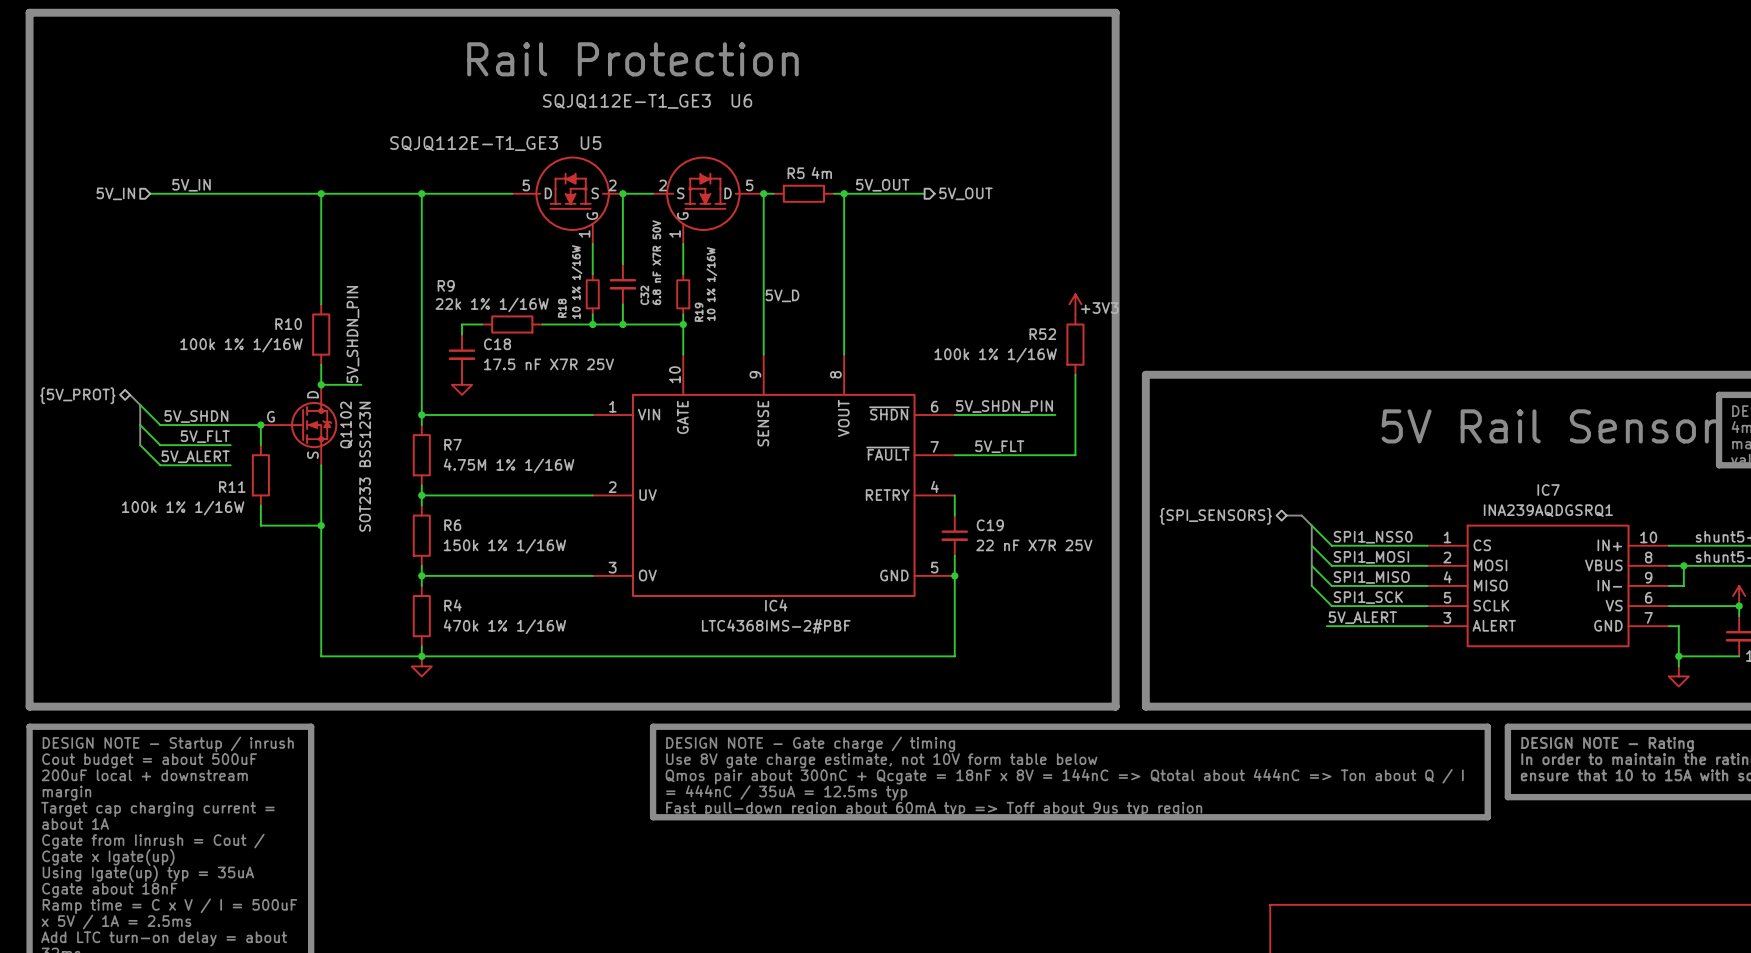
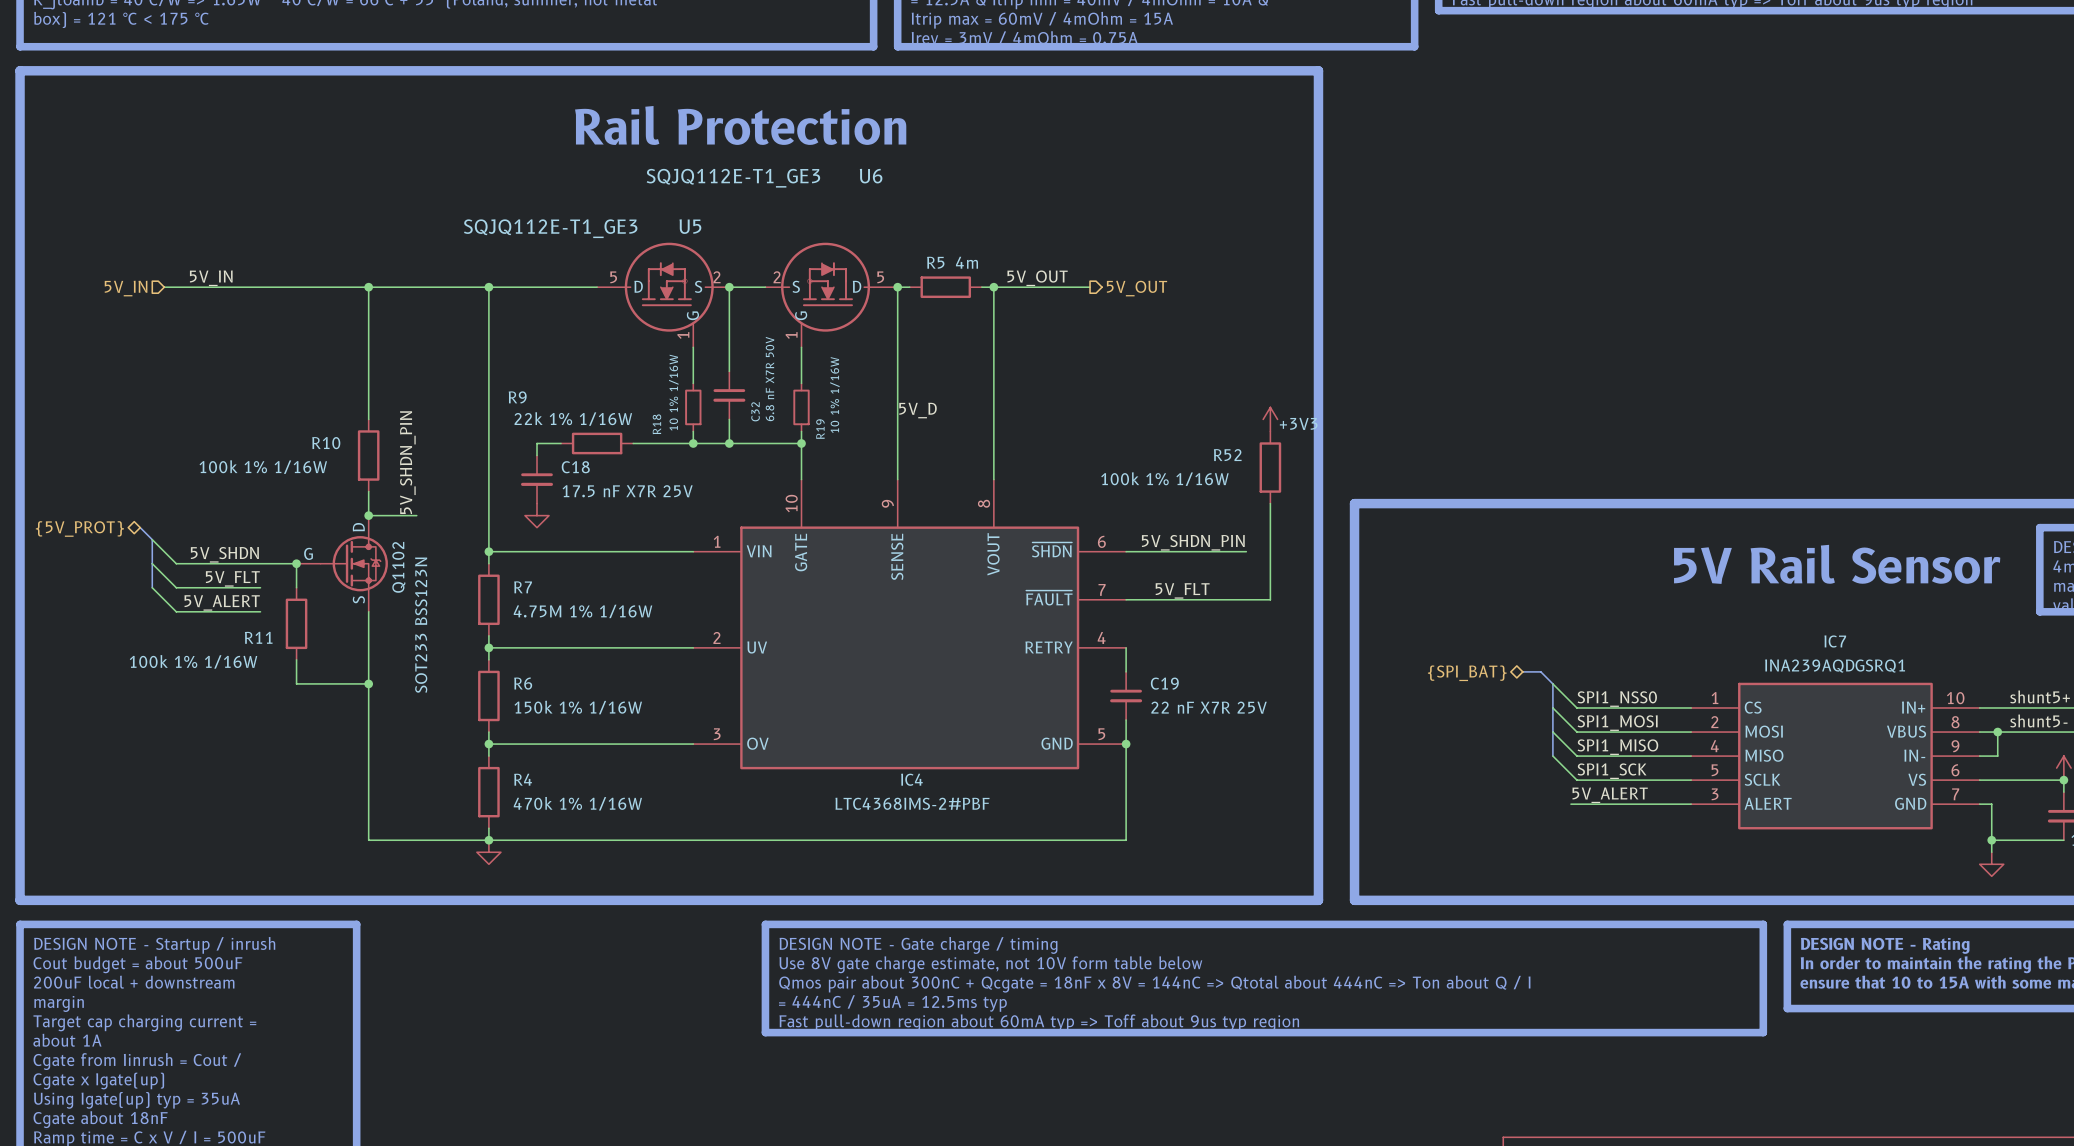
hierarchical label: {SPI_SENSORS} (1215, 516) -> {SPI_BAT} (1467, 673)

